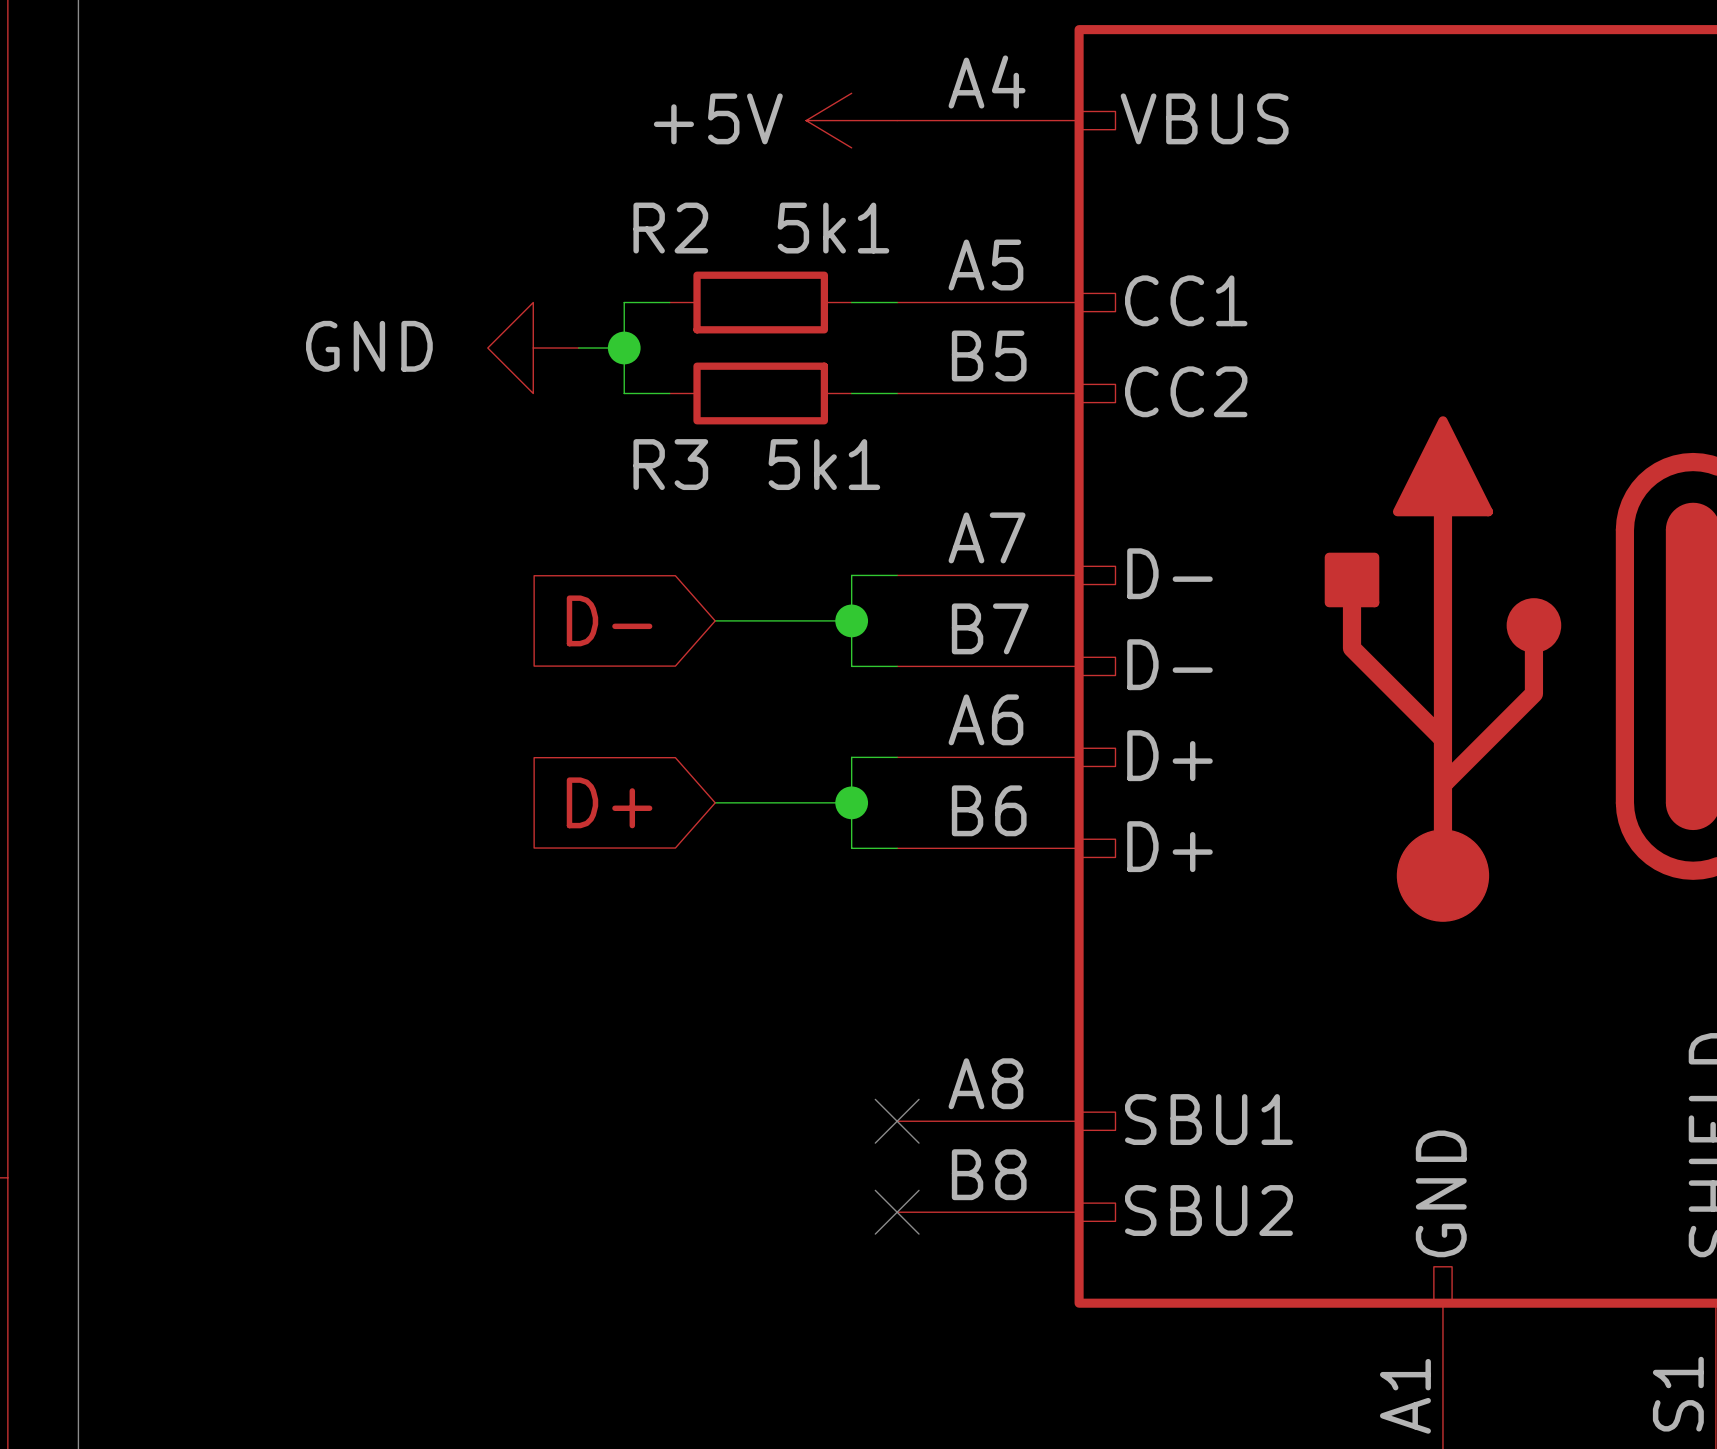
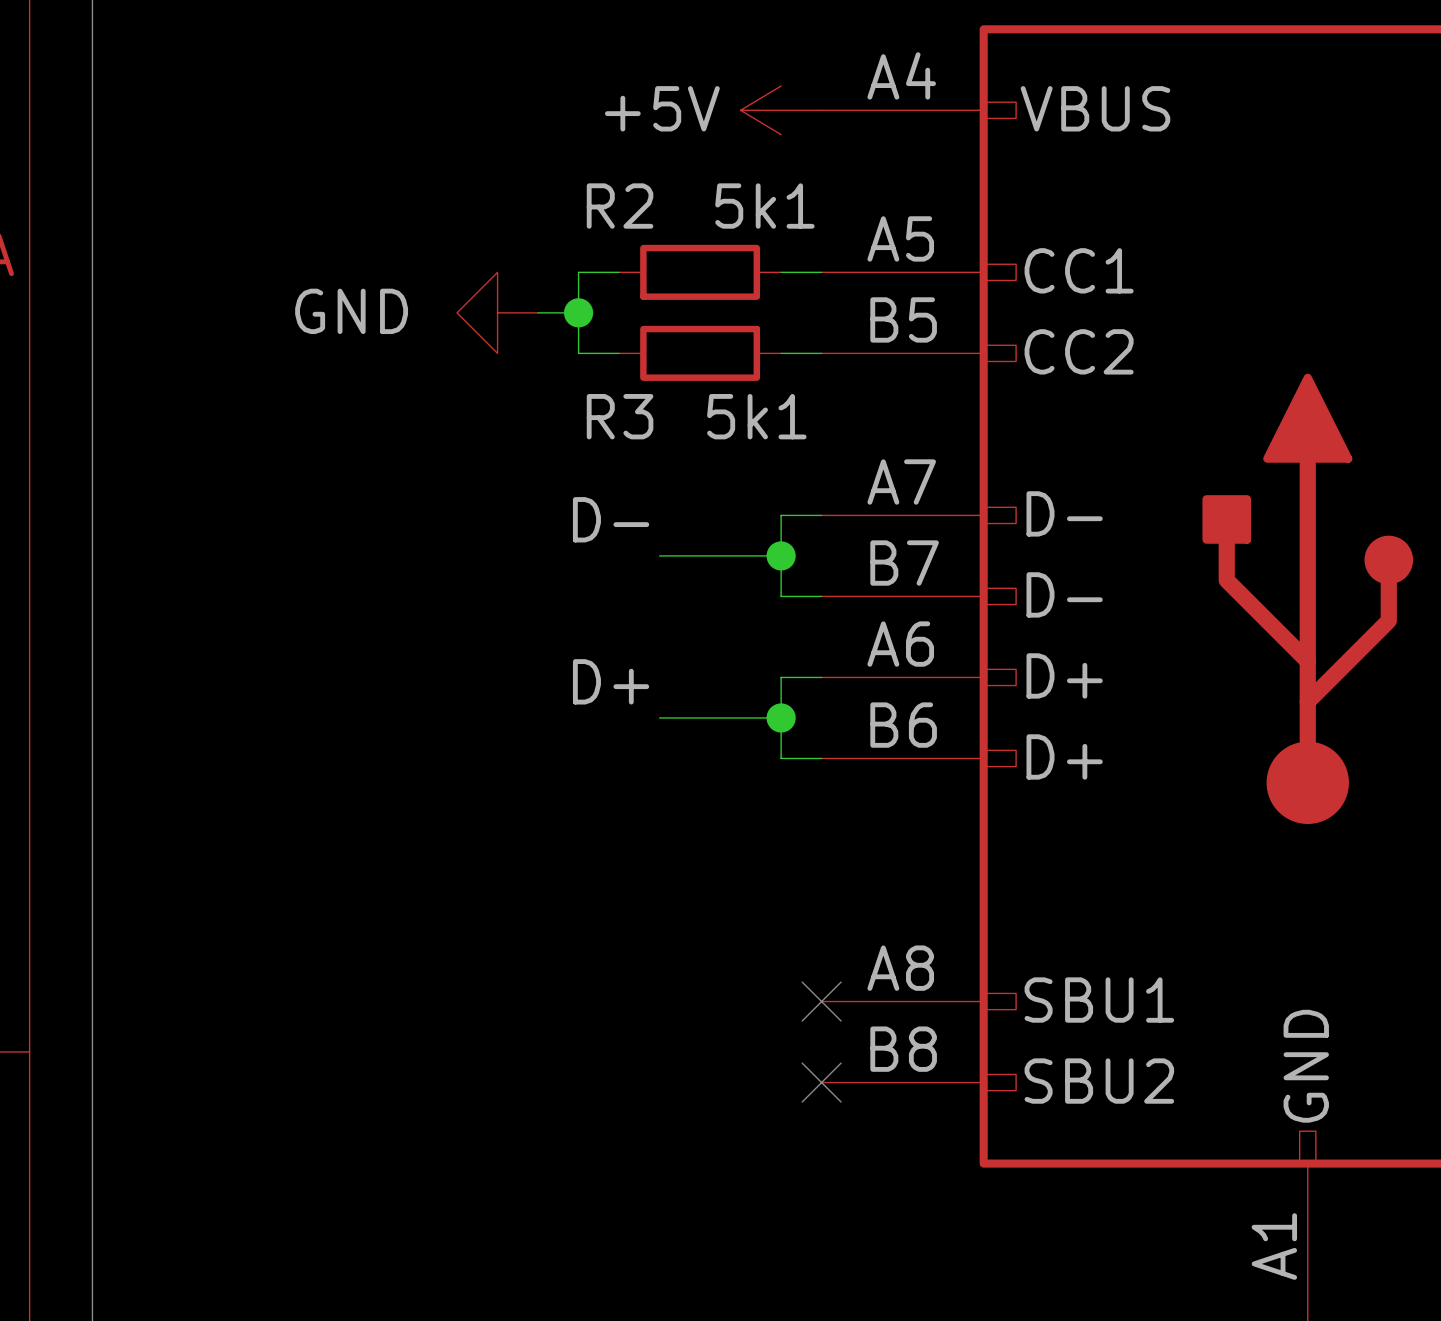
label: none -> D- (611, 519)
global label: D- (609, 620) -> none
label: none -> D+ (611, 681)
global label: D+ (609, 802) -> none

